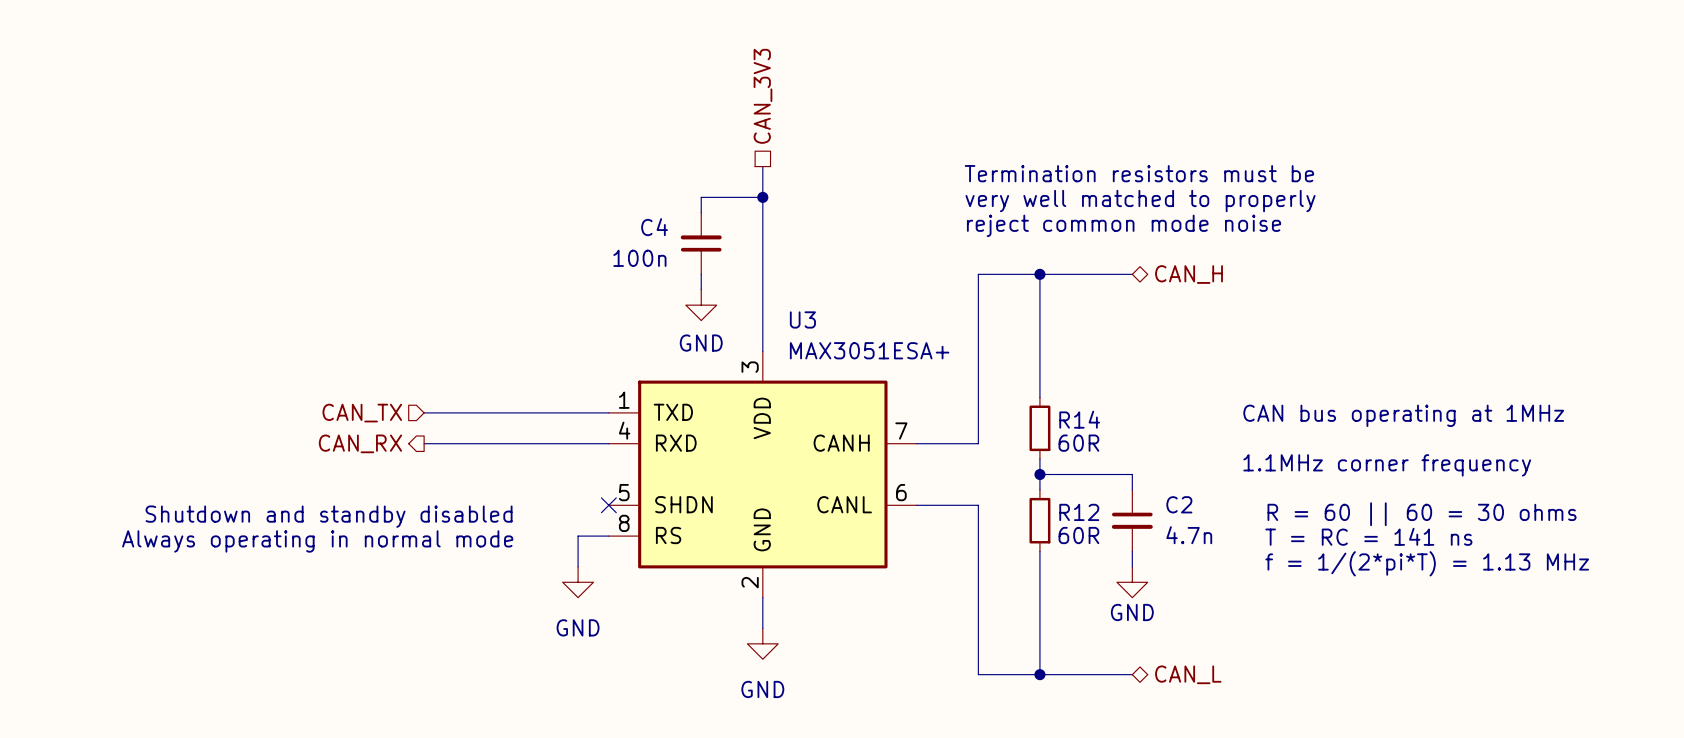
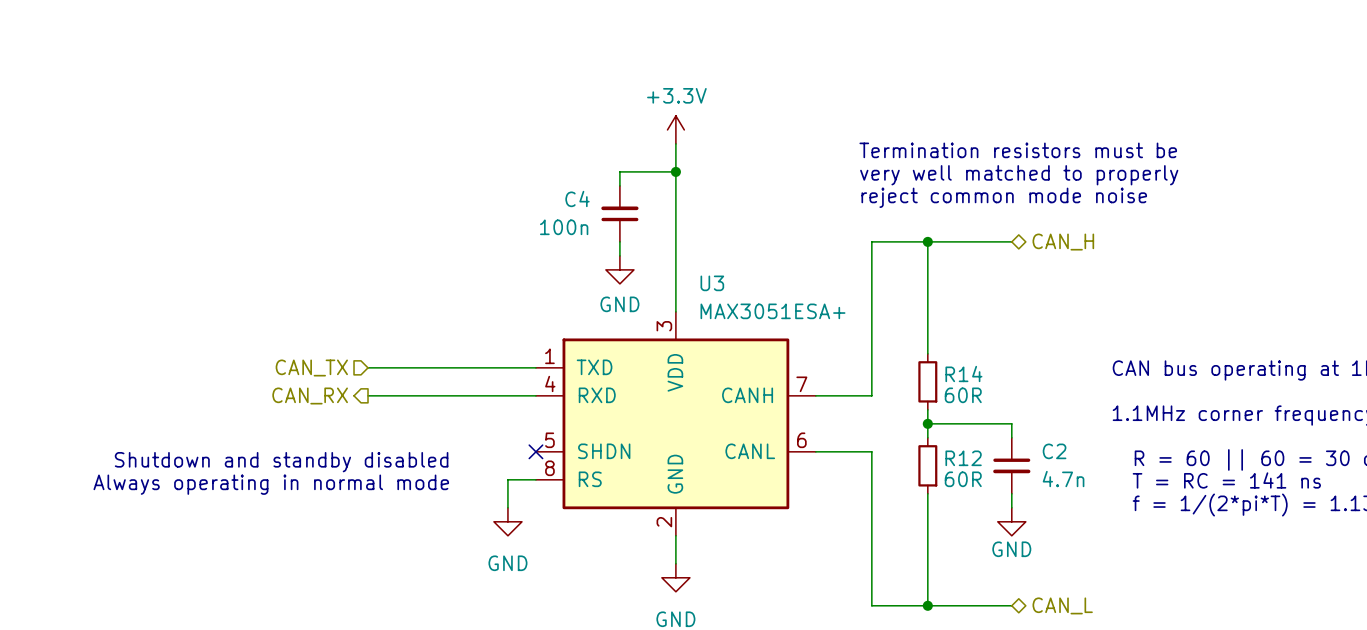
hierarchical label: CAN_3V3 (762, 96) -> none
power symbol: none -> +3.3V (675, 129)

